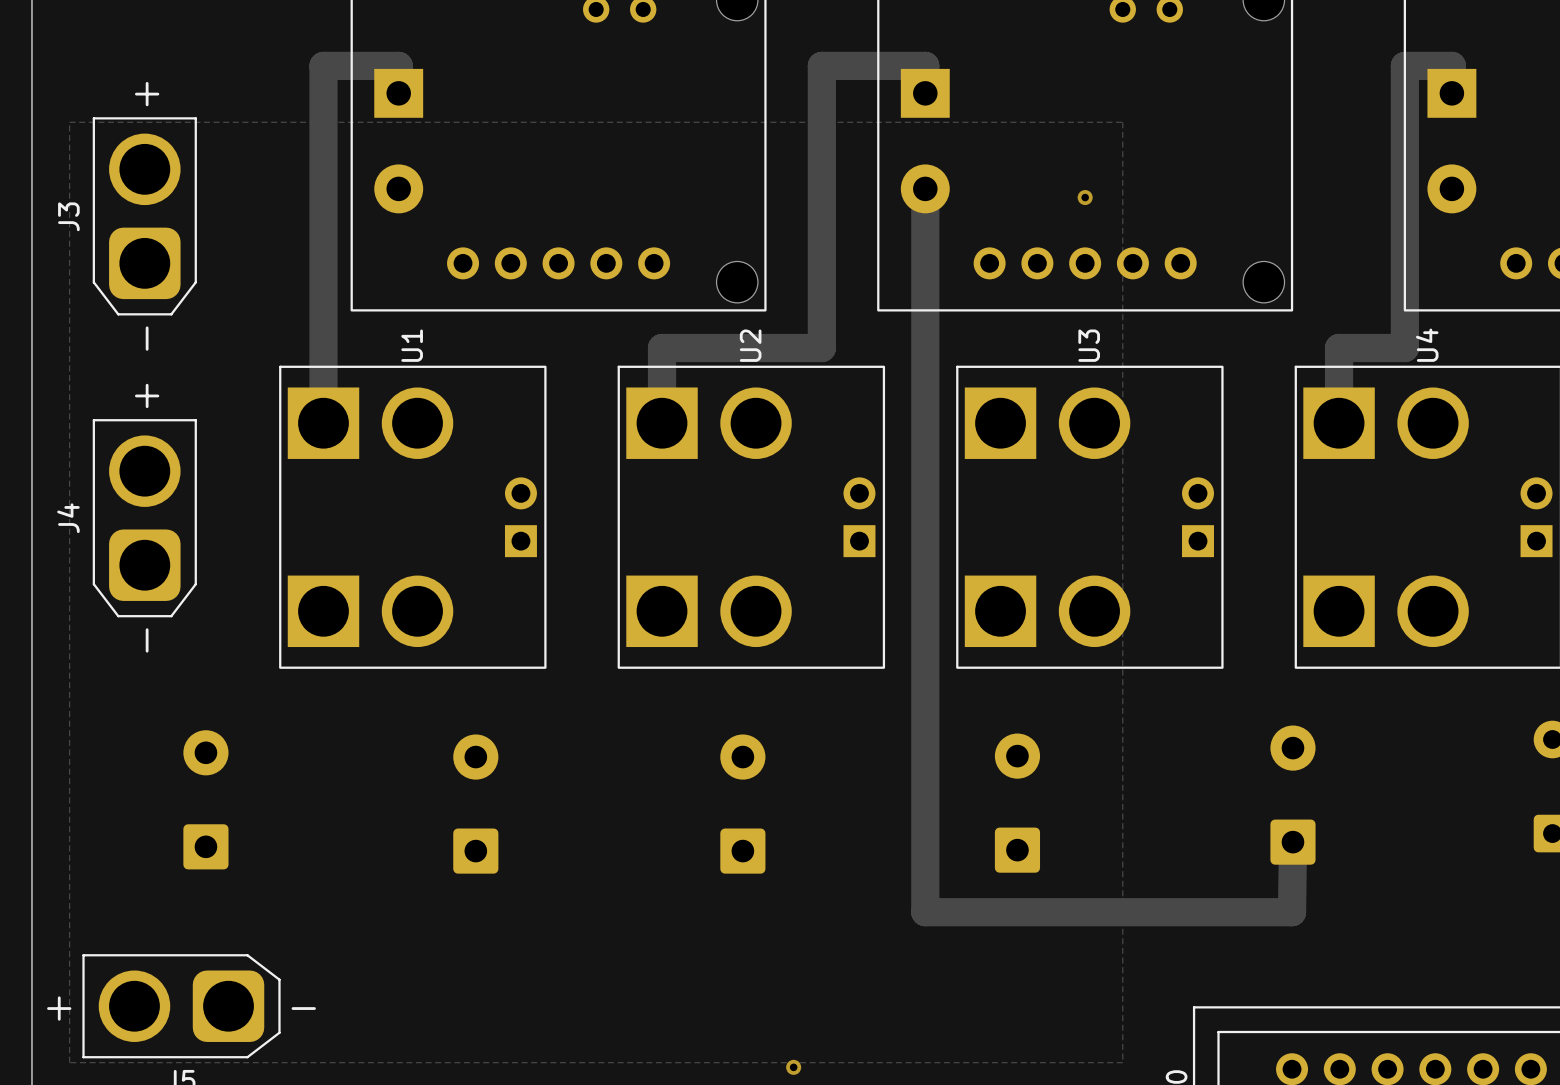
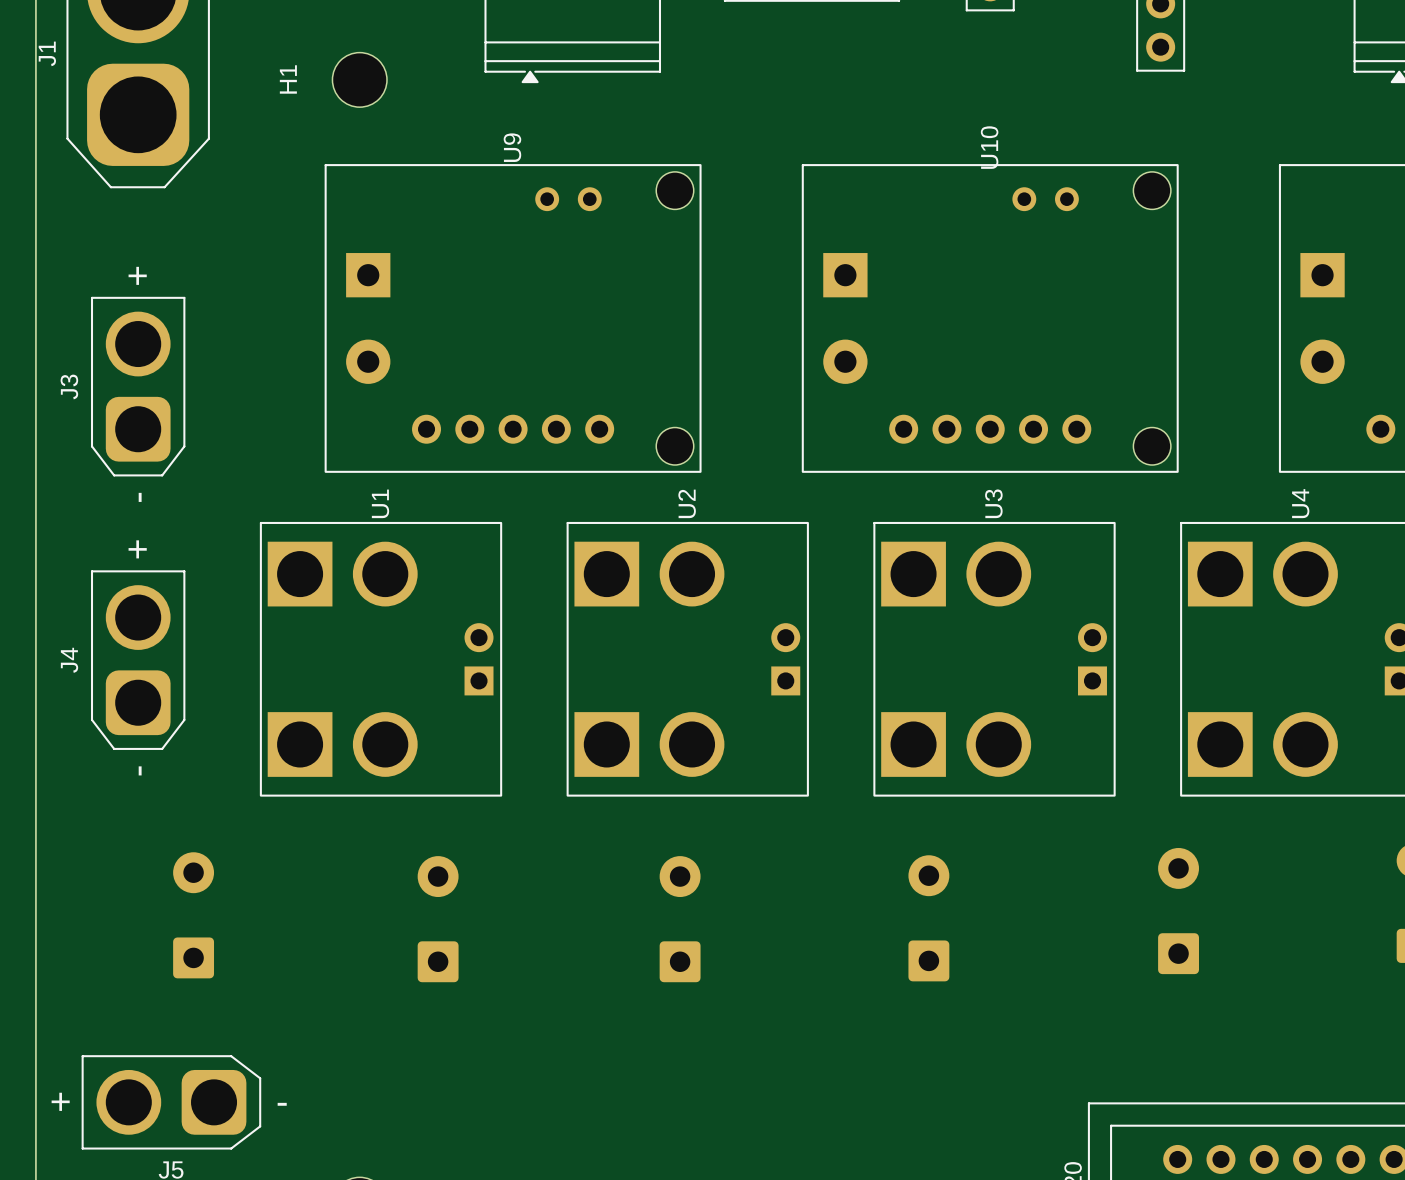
track: (398, 93) (398, 65) (323, 65) (323, 423) -> none
track: (925, 93) (925, 65) (821, 65) (821, 347) (662, 347) (662, 423) -> none
track: (1451, 93) (1451, 65) (1404, 65) (1404, 347) (1339, 347) (1339, 423) -> none
zone outline: (69, 122) (1122, 122) (1122, 1062) (69, 1062) (69, 122) -> none
track: (925, 188) (925, 912) (1292, 912) (1292, 842) -> none
via: (1085, 197) -> none
via: (793, 1067) -> none

